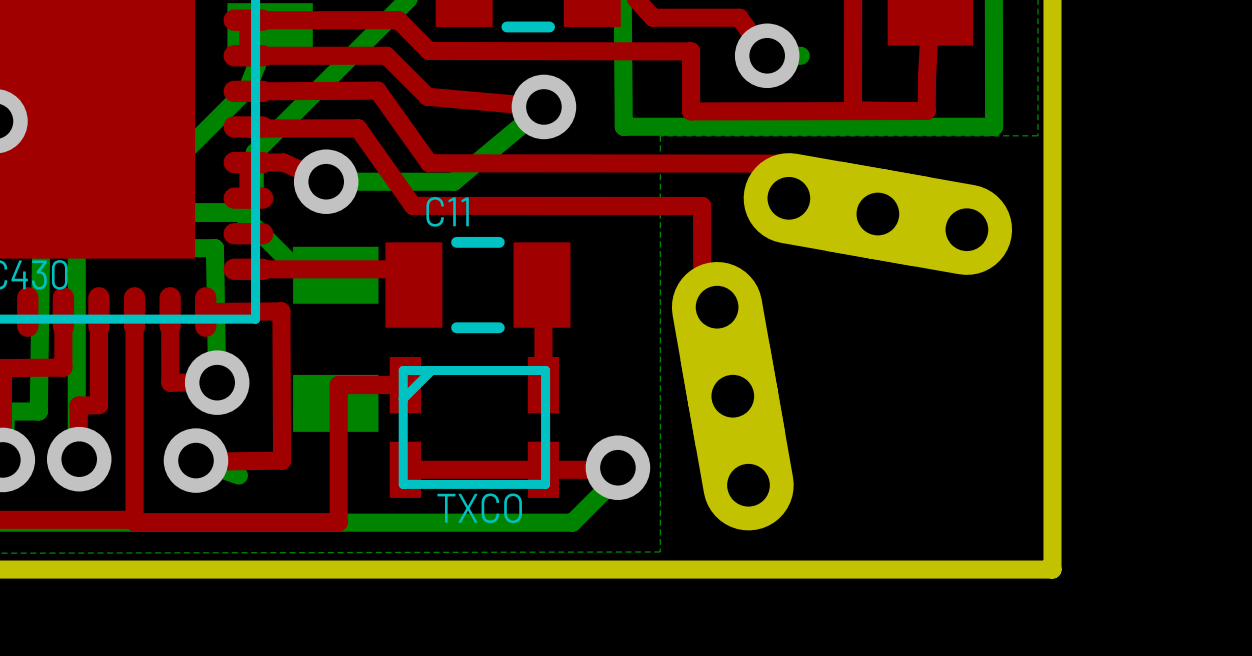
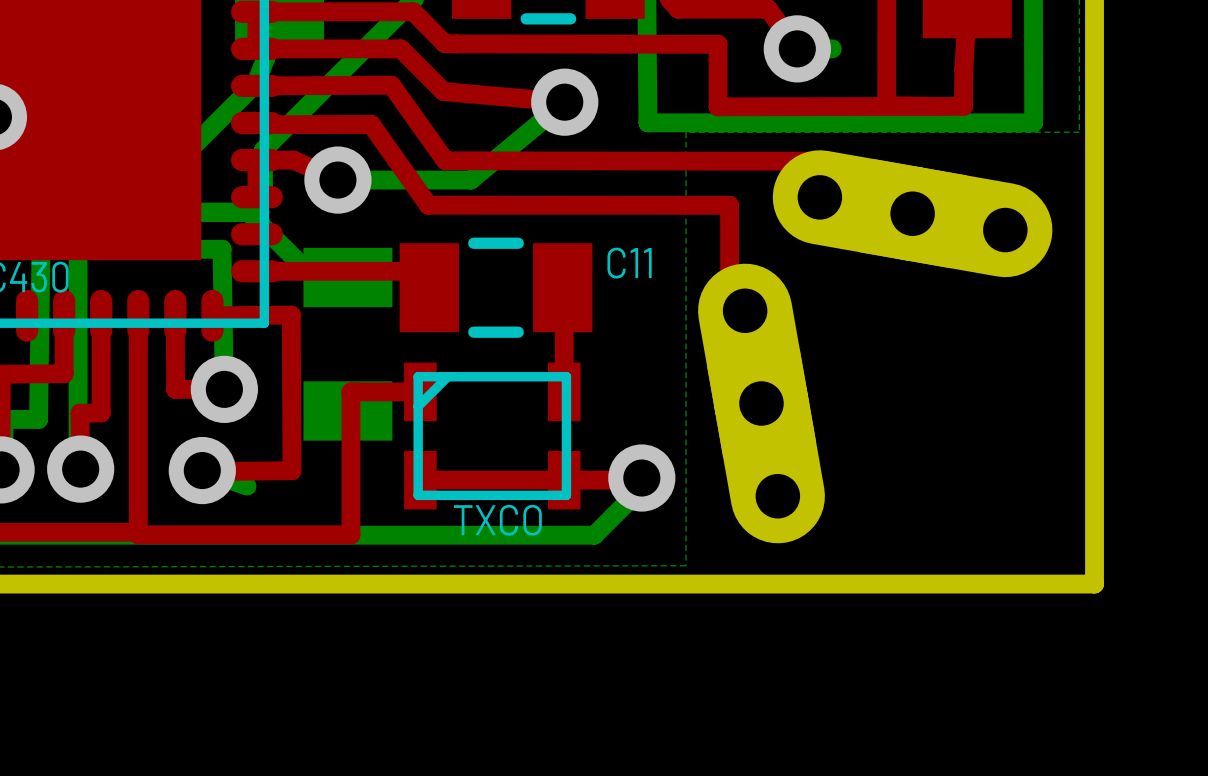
C11 name position: C11 (447, 211) -> C11 (629, 263)

